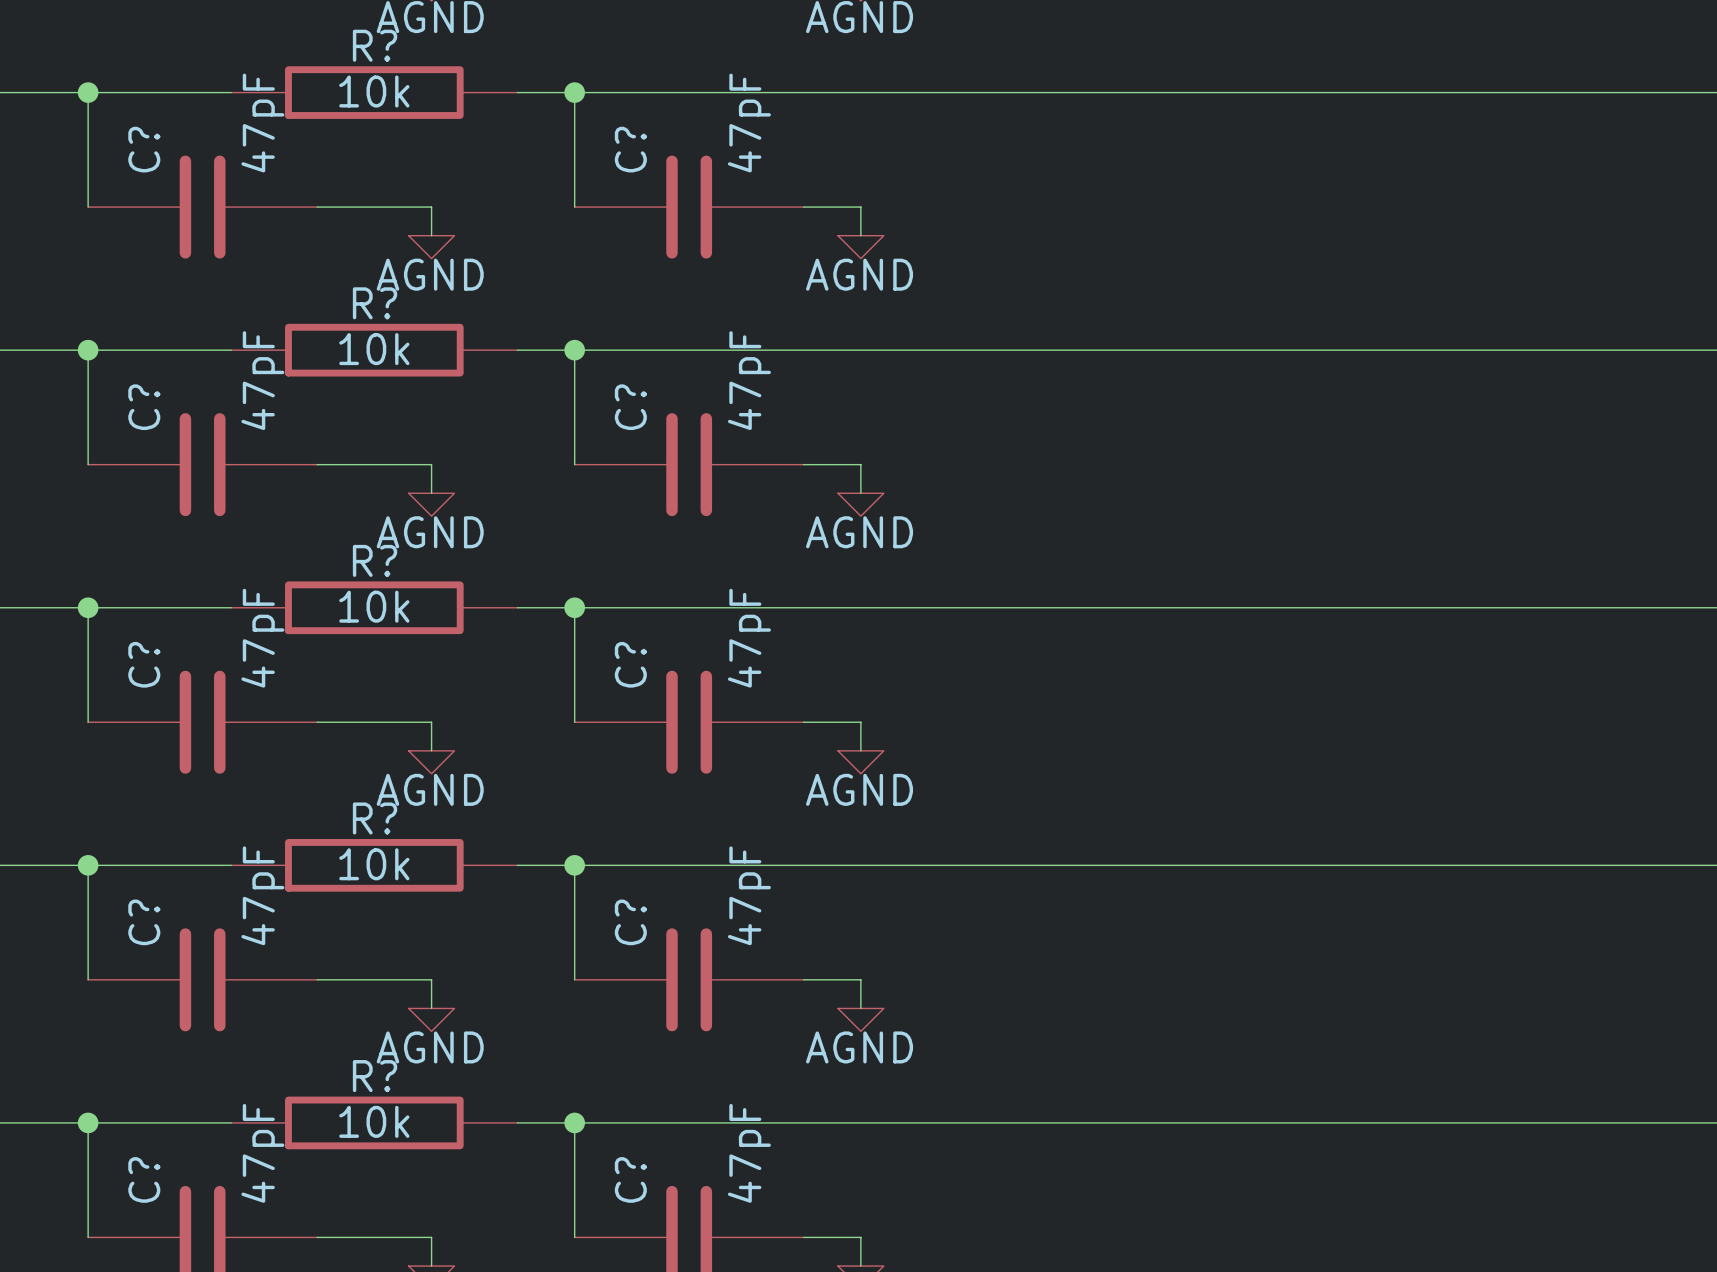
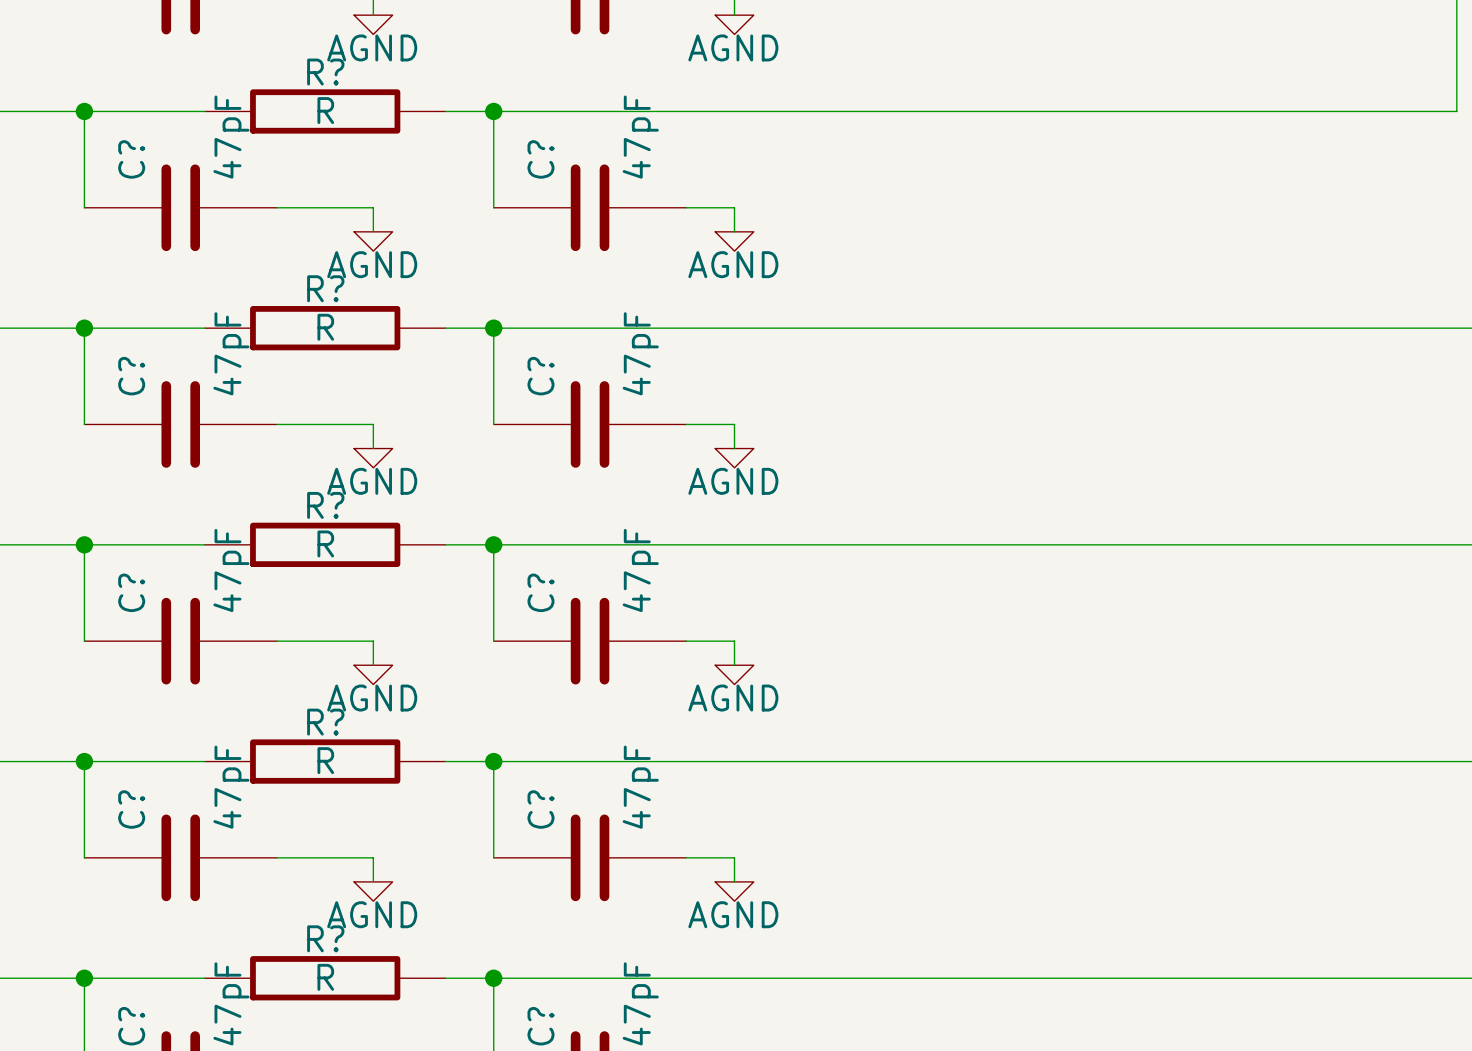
R? value: 10k (374, 91) -> R (325, 110)
R? value: 10k (374, 349) -> R (325, 327)
R? value: 10k (374, 606) -> R (325, 543)
R? value: 10k (374, 864) -> R (325, 760)
R? value: 10k (374, 1121) -> R (325, 977)

